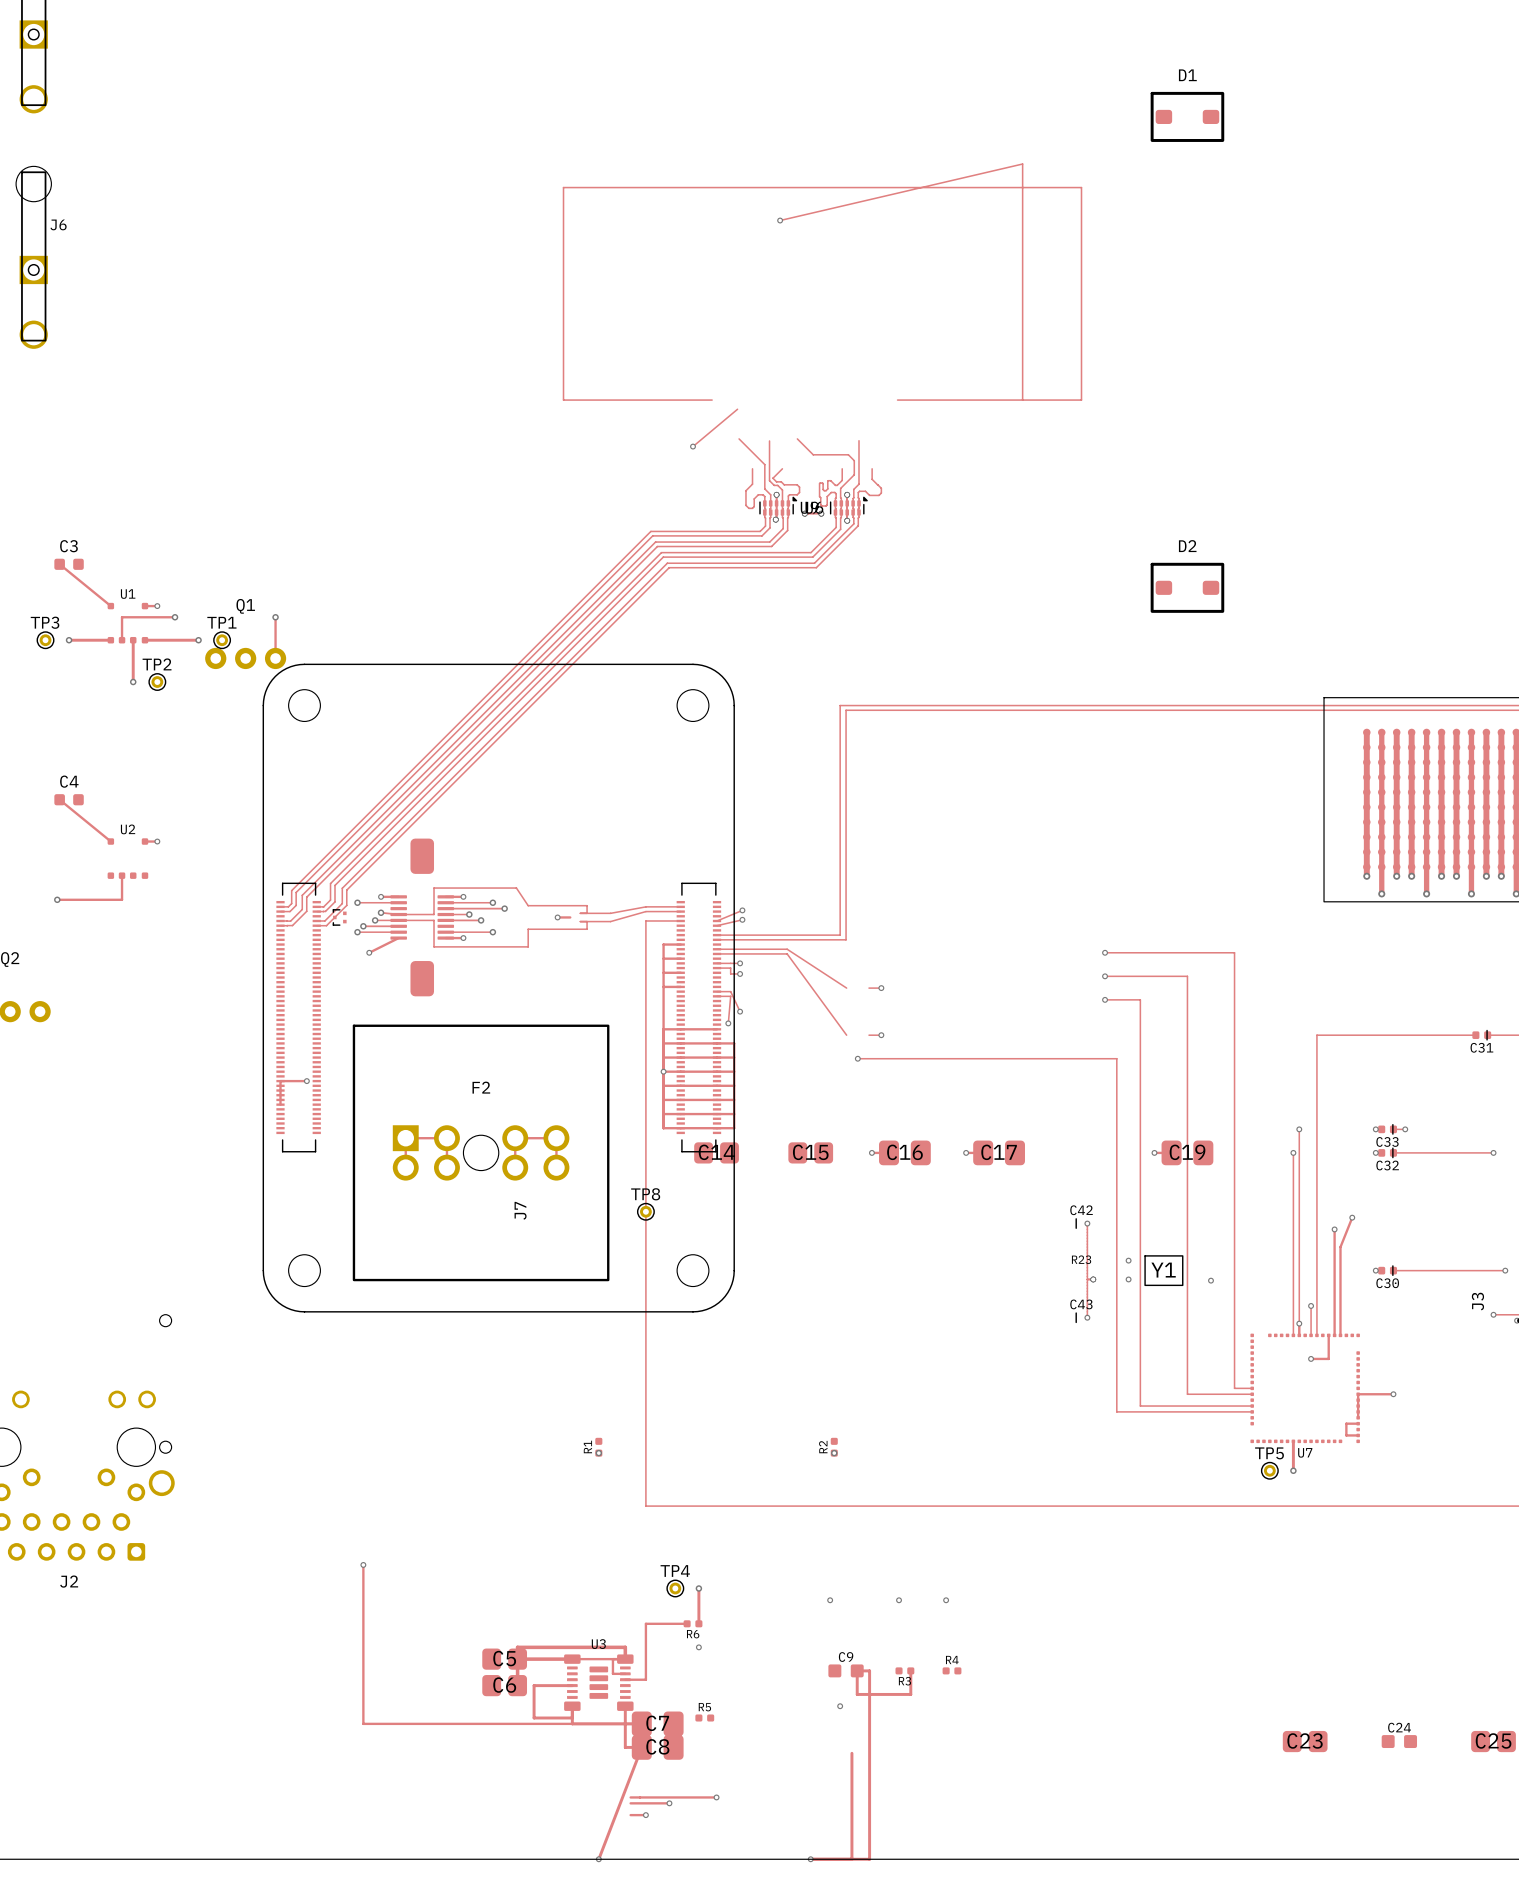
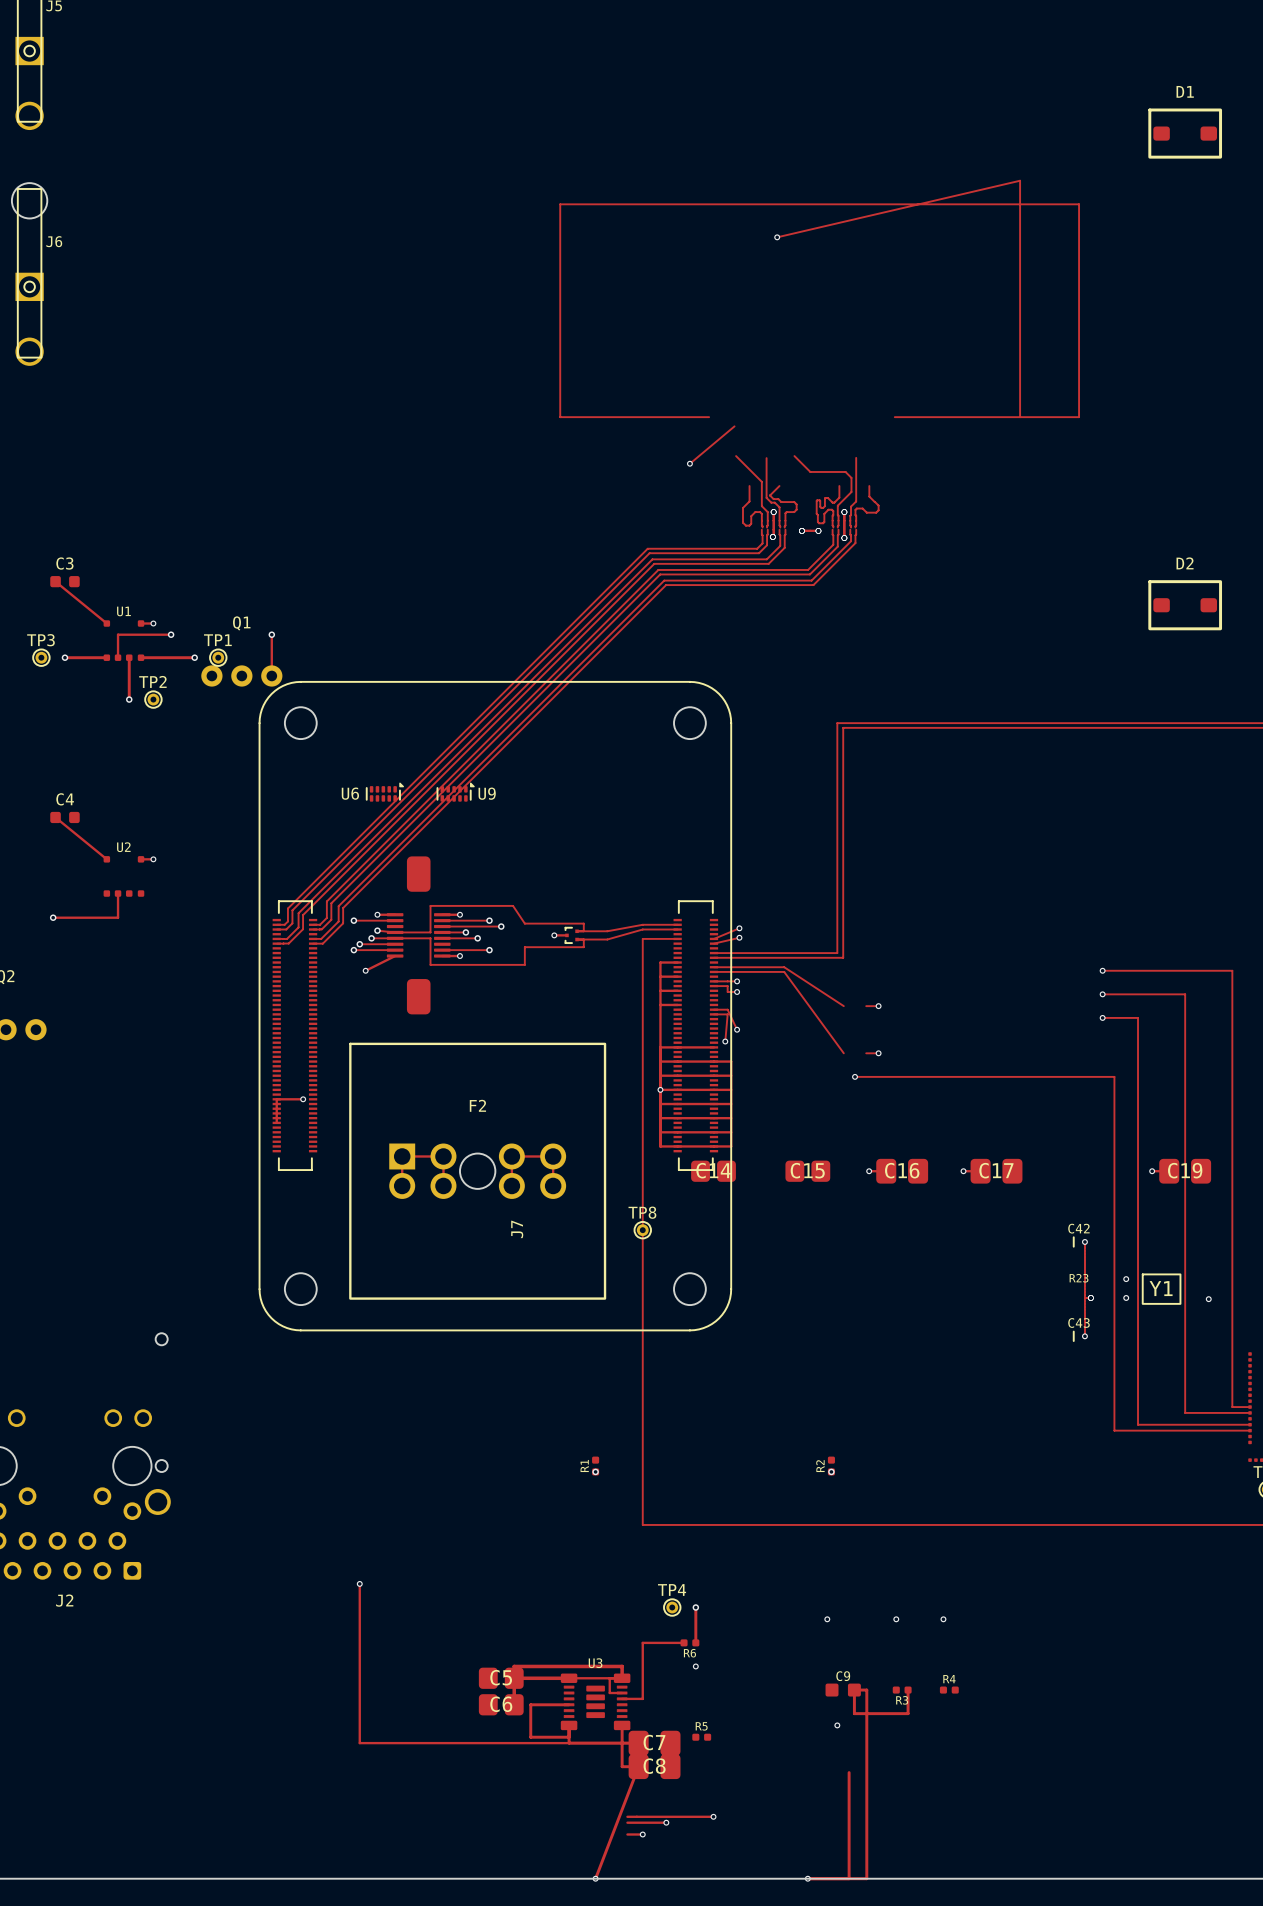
U9 position: (778, 506) -> (455, 792)
U6 position: (848, 506) -> (385, 792)
part position: (339, 917) -> (571, 935)

